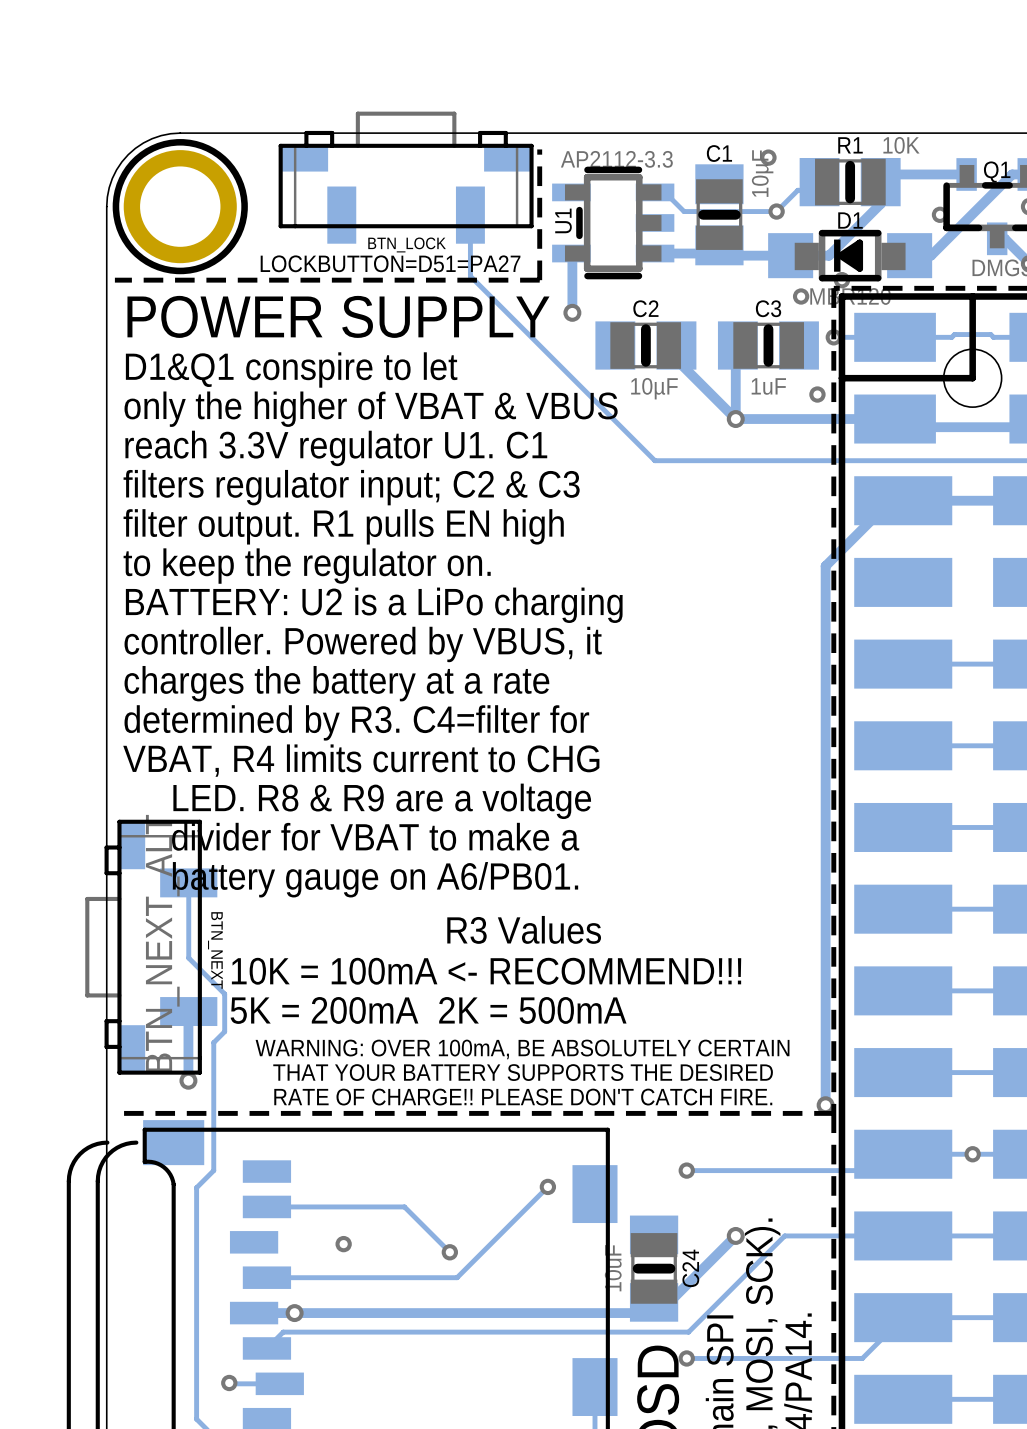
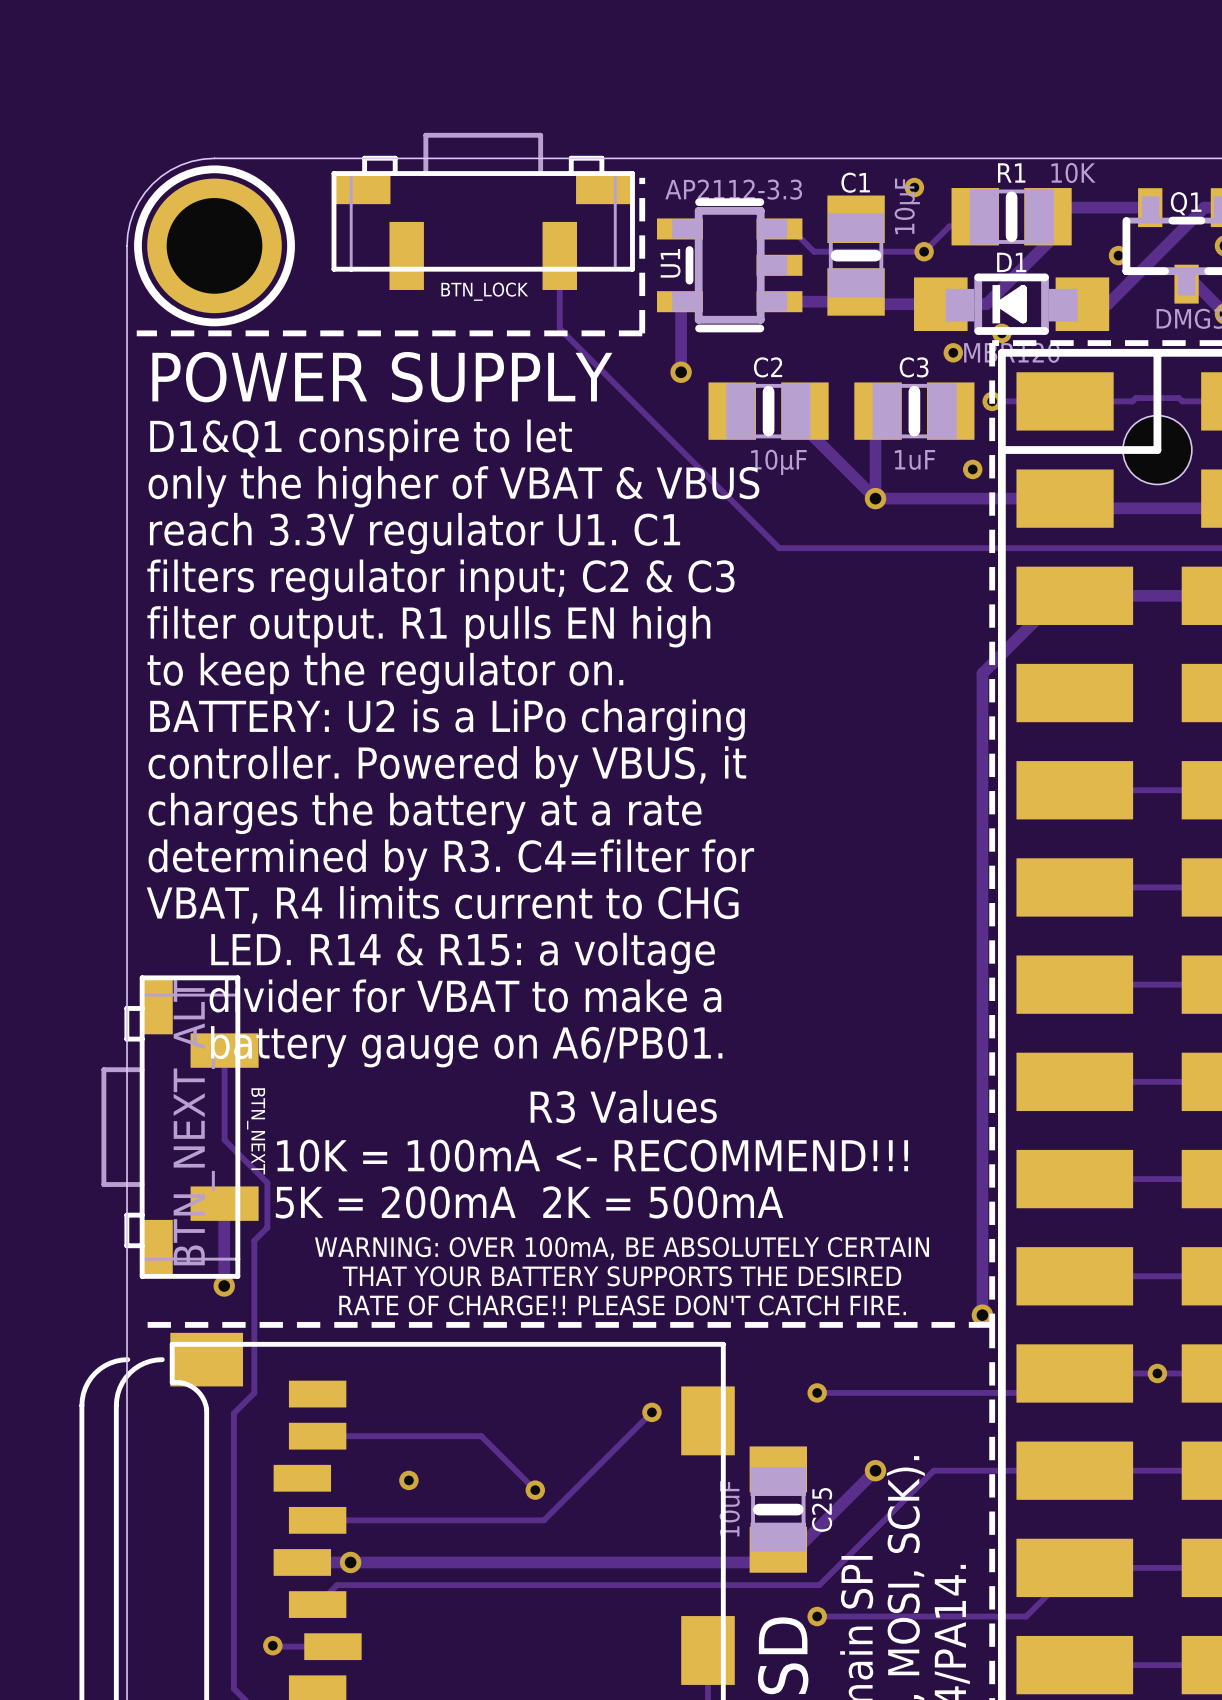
text: LOCKBUTTON=D51=PA27 (390, 263) -> none
text: LED. R8 & R9 are a voltage (382, 801) -> LED. R14 & R15: a voltage (463, 953)
C24 name: C24 (690, 1268) -> C25 (822, 1509)

